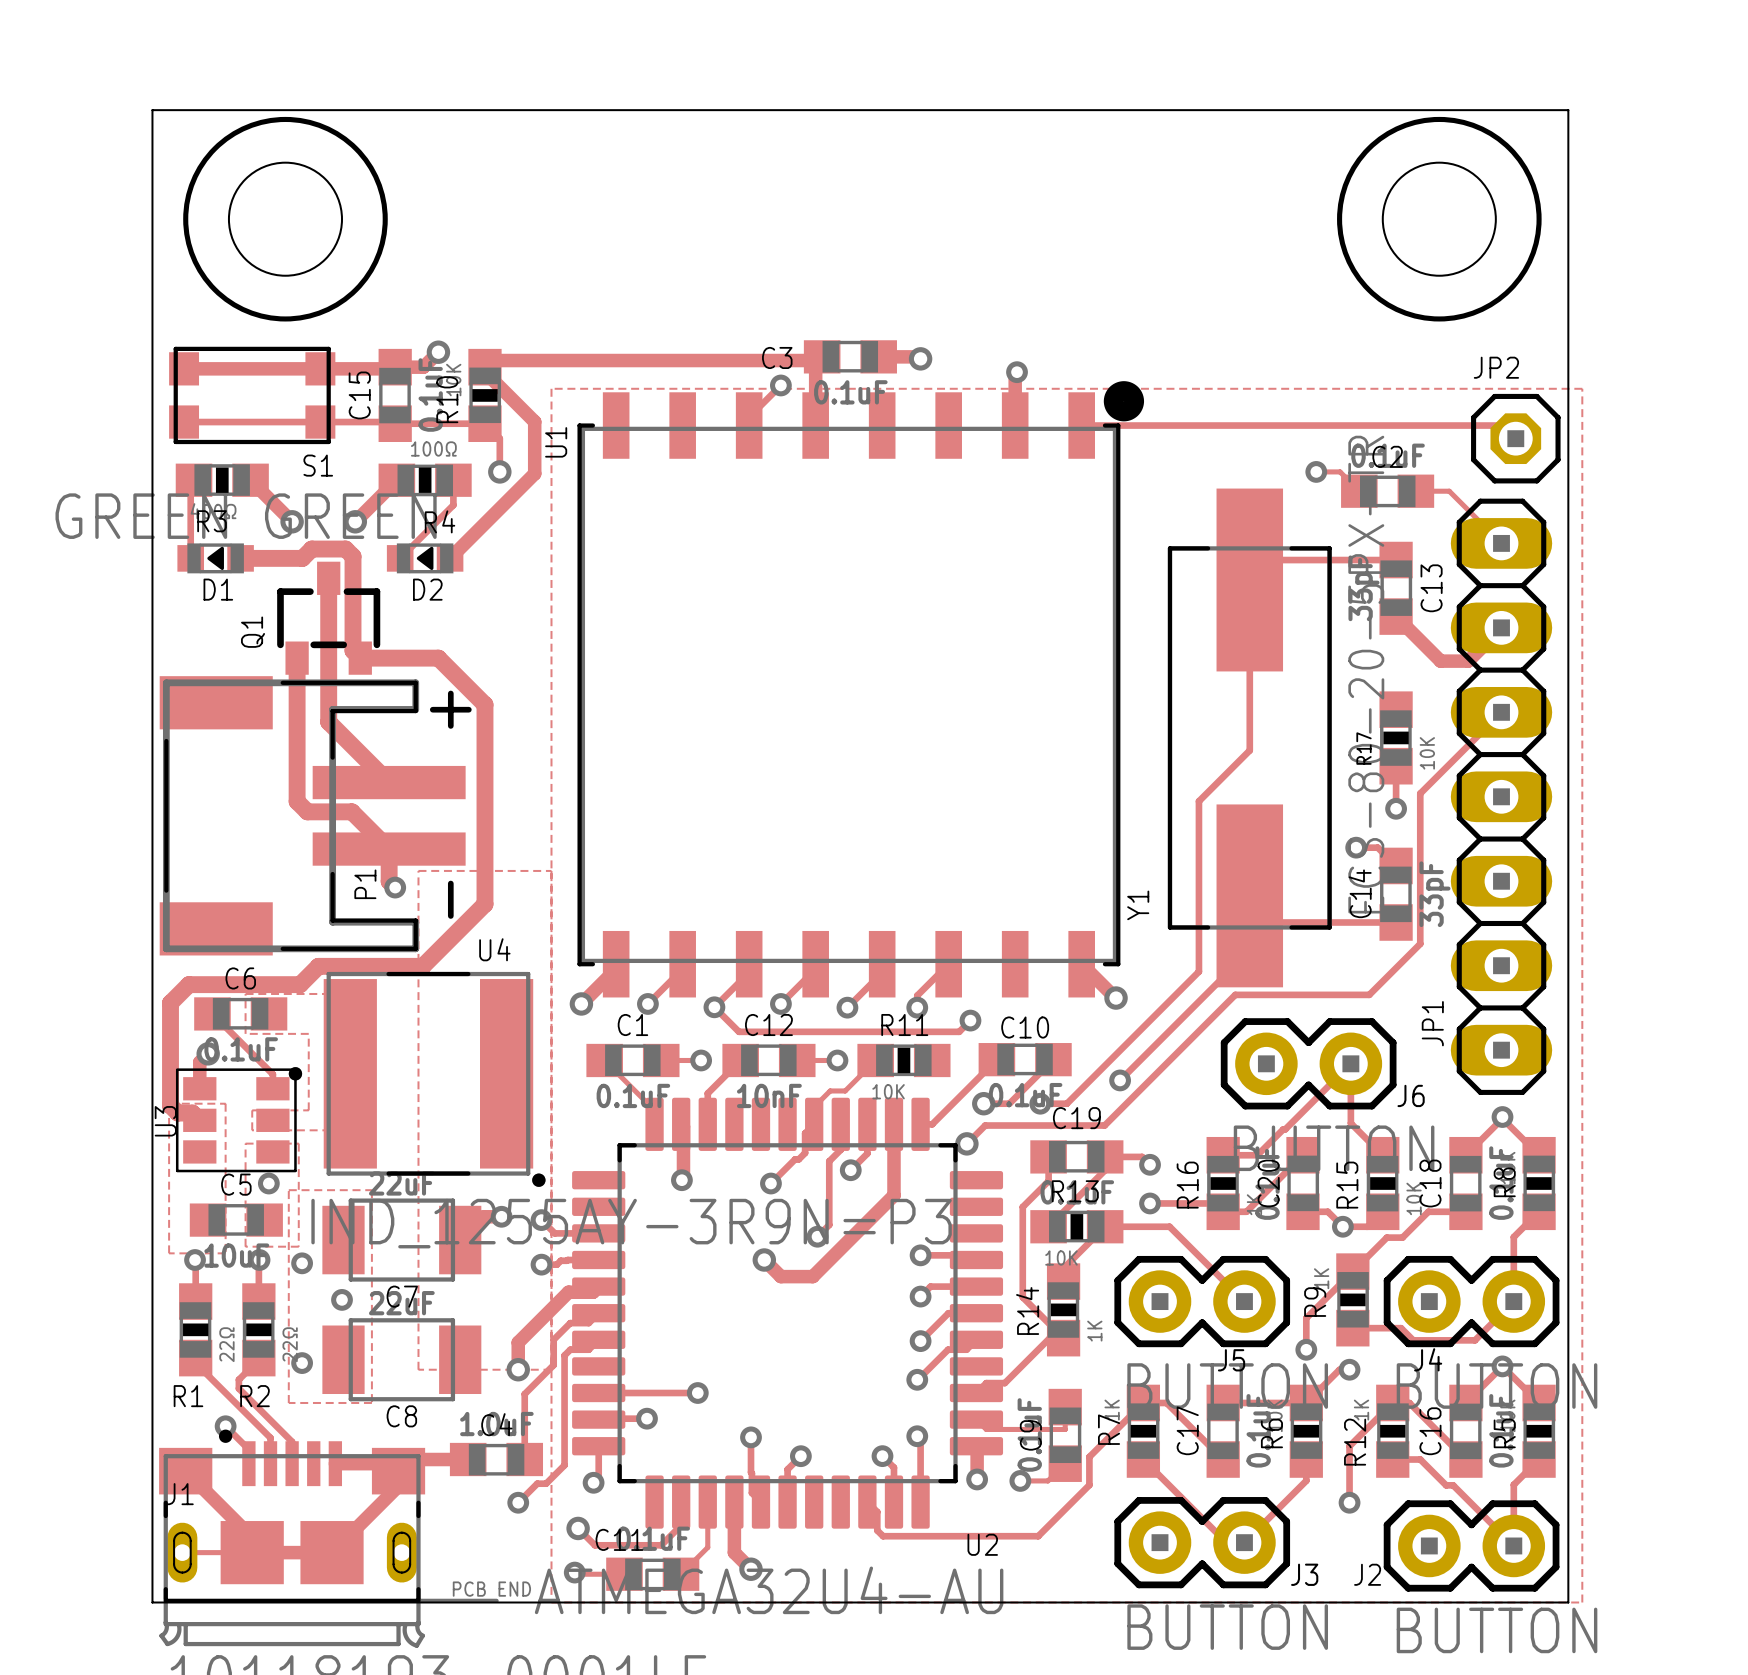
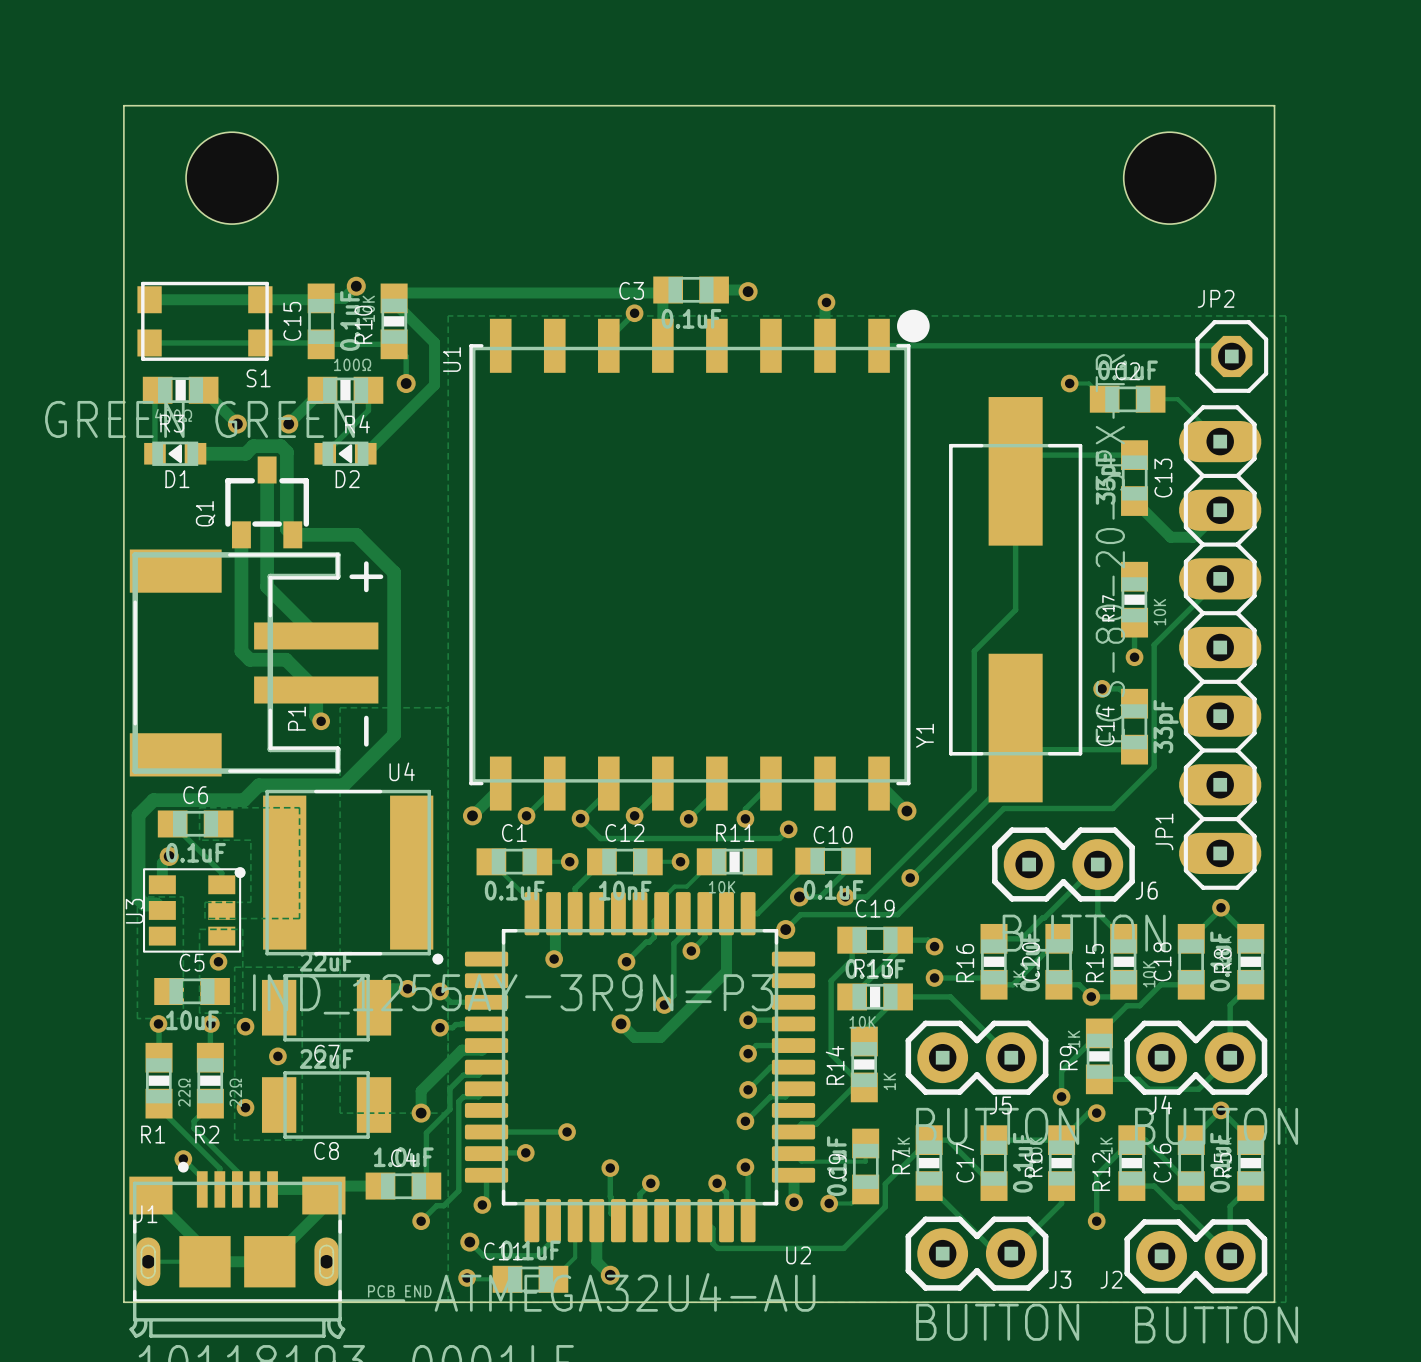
drawing: [183, 116, 388, 322] -> none
drawing: [1337, 116, 1542, 322] -> none
board edge: (152, 130) (152, 110) (1568, 110) (1568, 130) -> (123, 105) (1274, 105)

